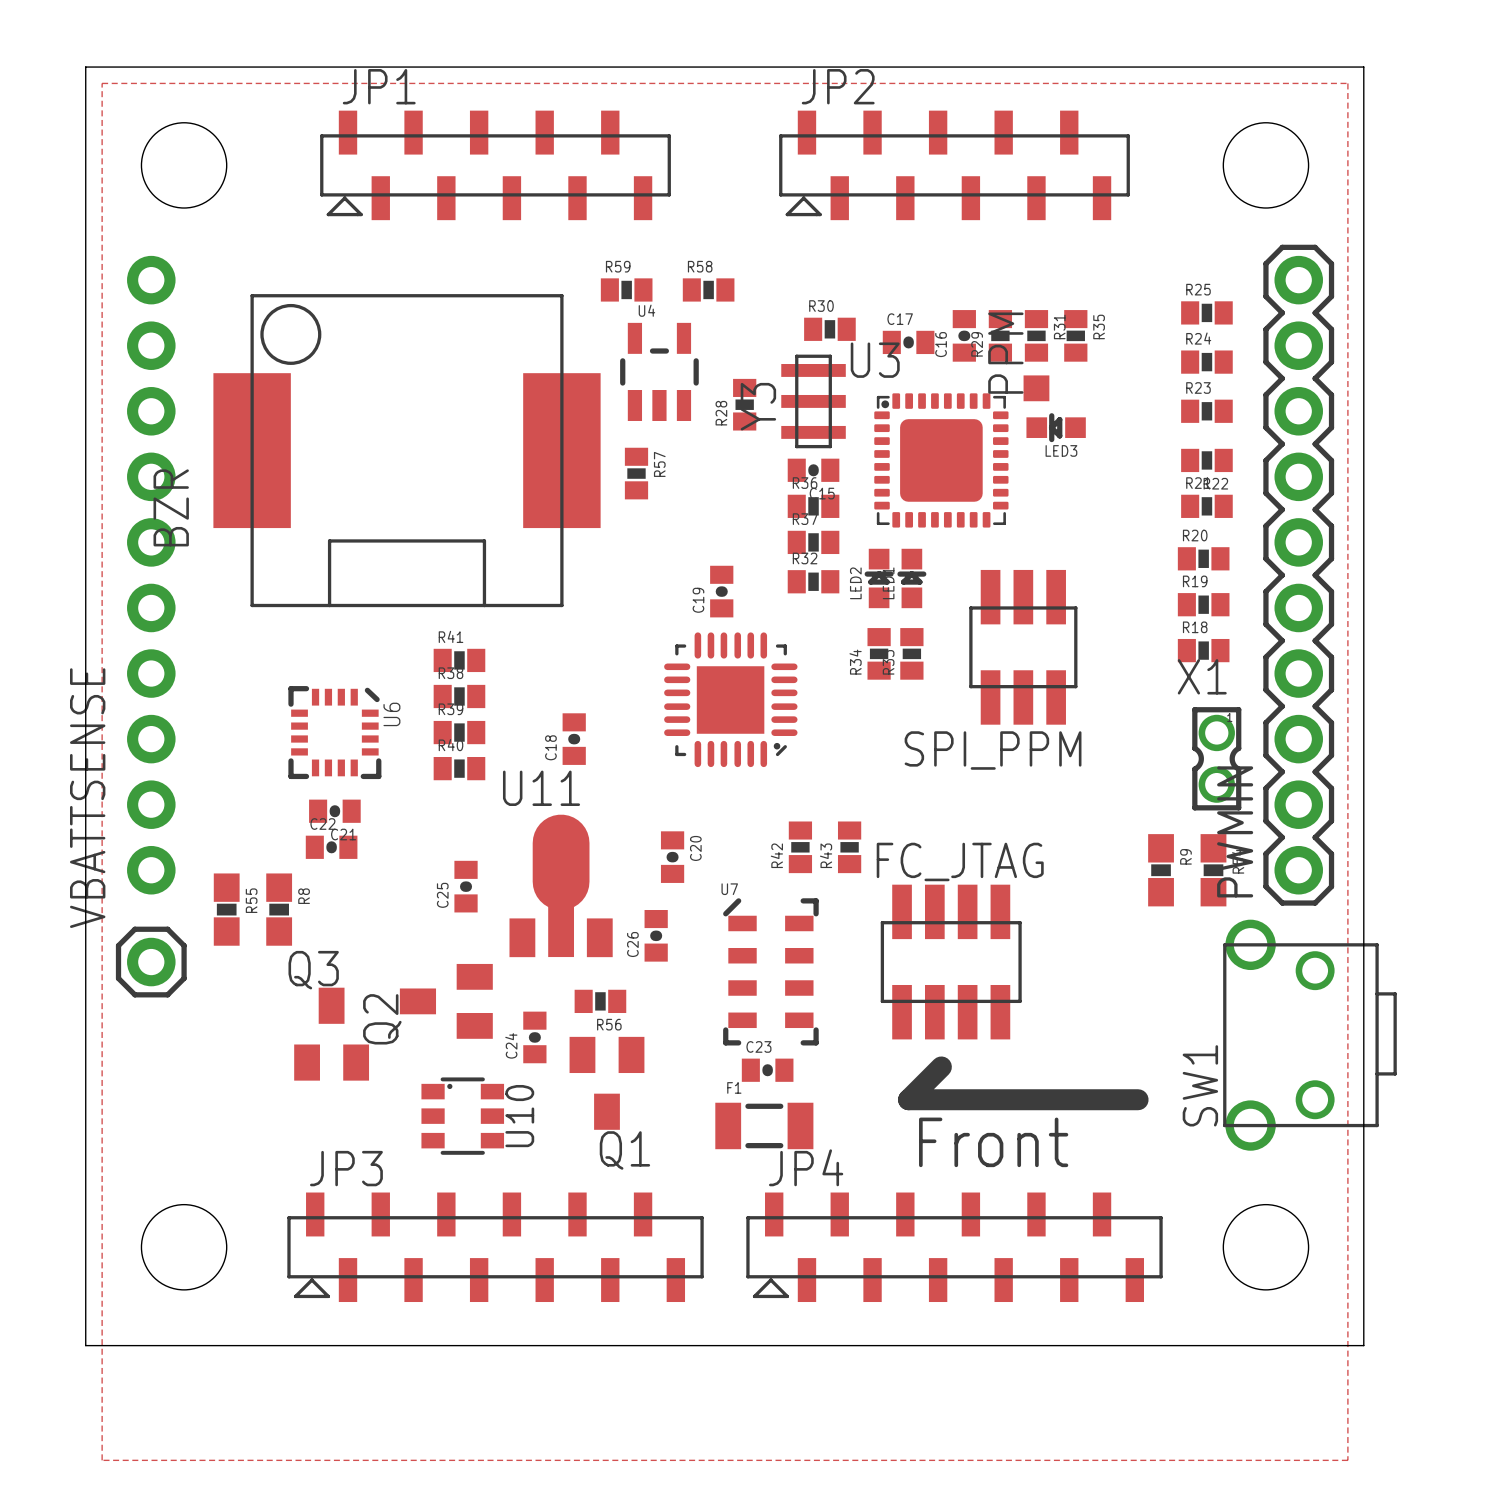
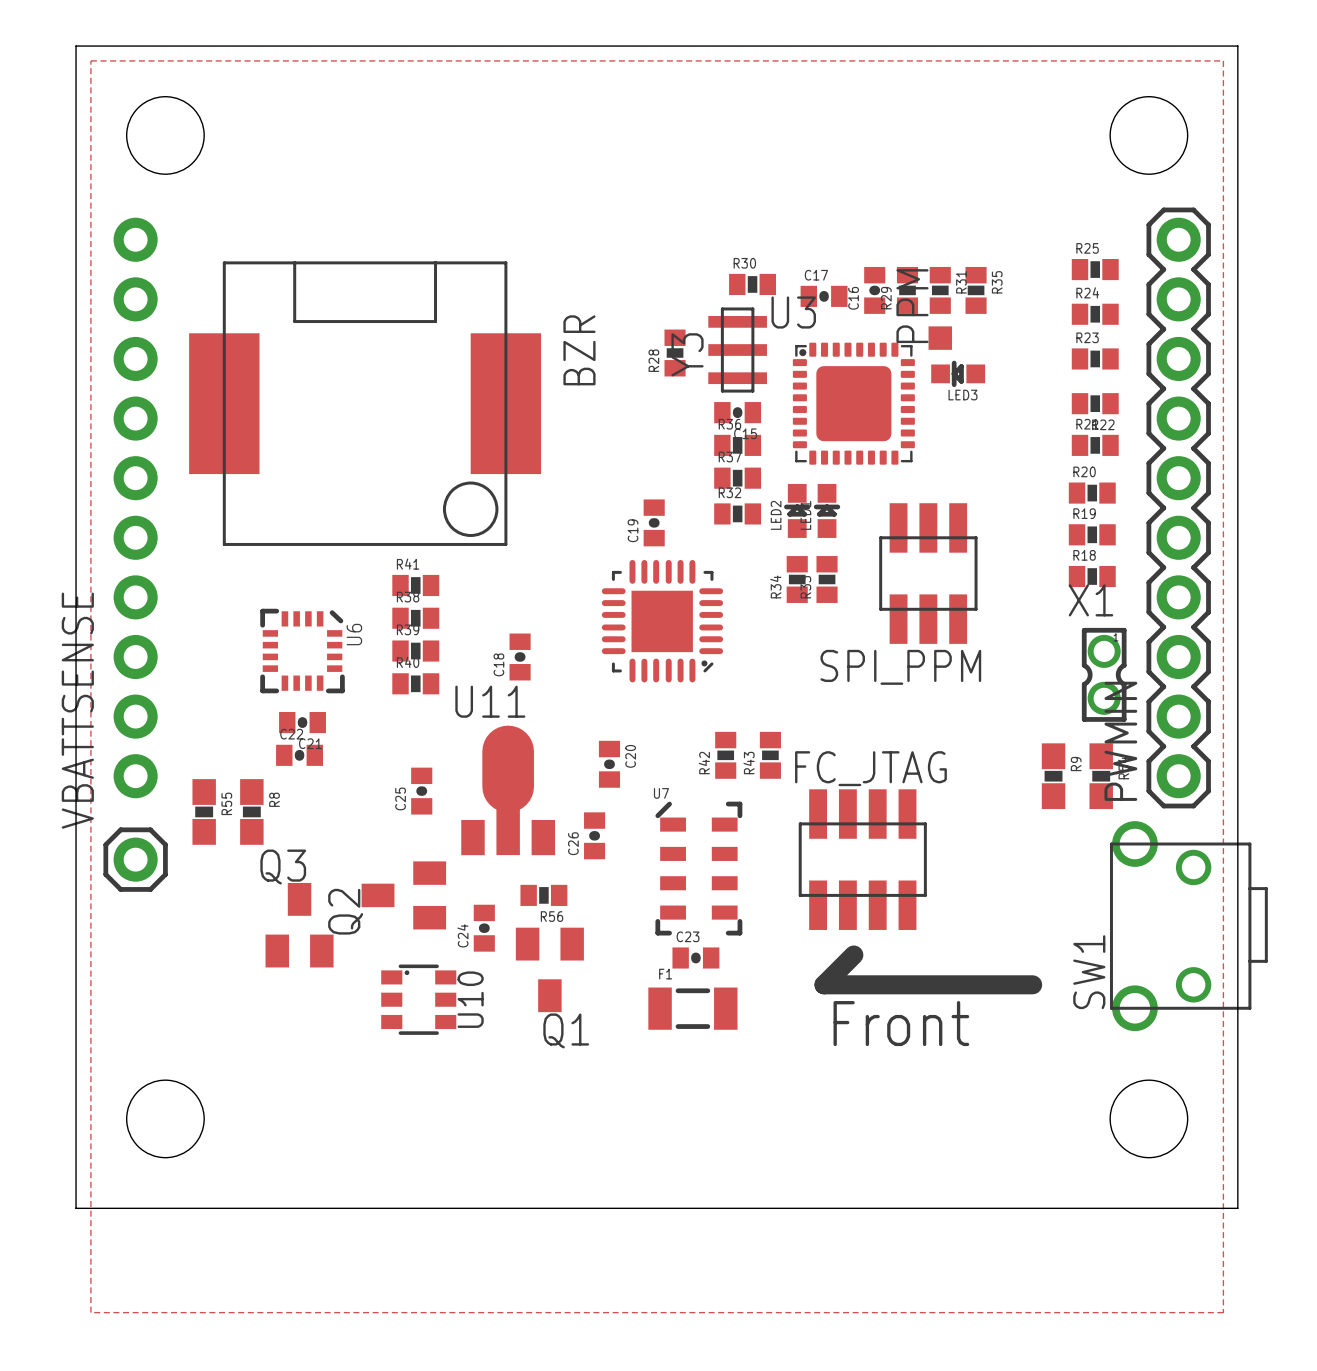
JP1: (495, 165) -> none
JP2: (954, 165) -> none
R59: (626, 289) -> none
R58: (708, 289) -> none
U4: (659, 371) -> none
BZR rotation: 0° (407, 450) -> 180° (365, 403)
R57: (636, 473) -> none
JP3: (495, 1247) -> none
JP4: (954, 1247) -> none

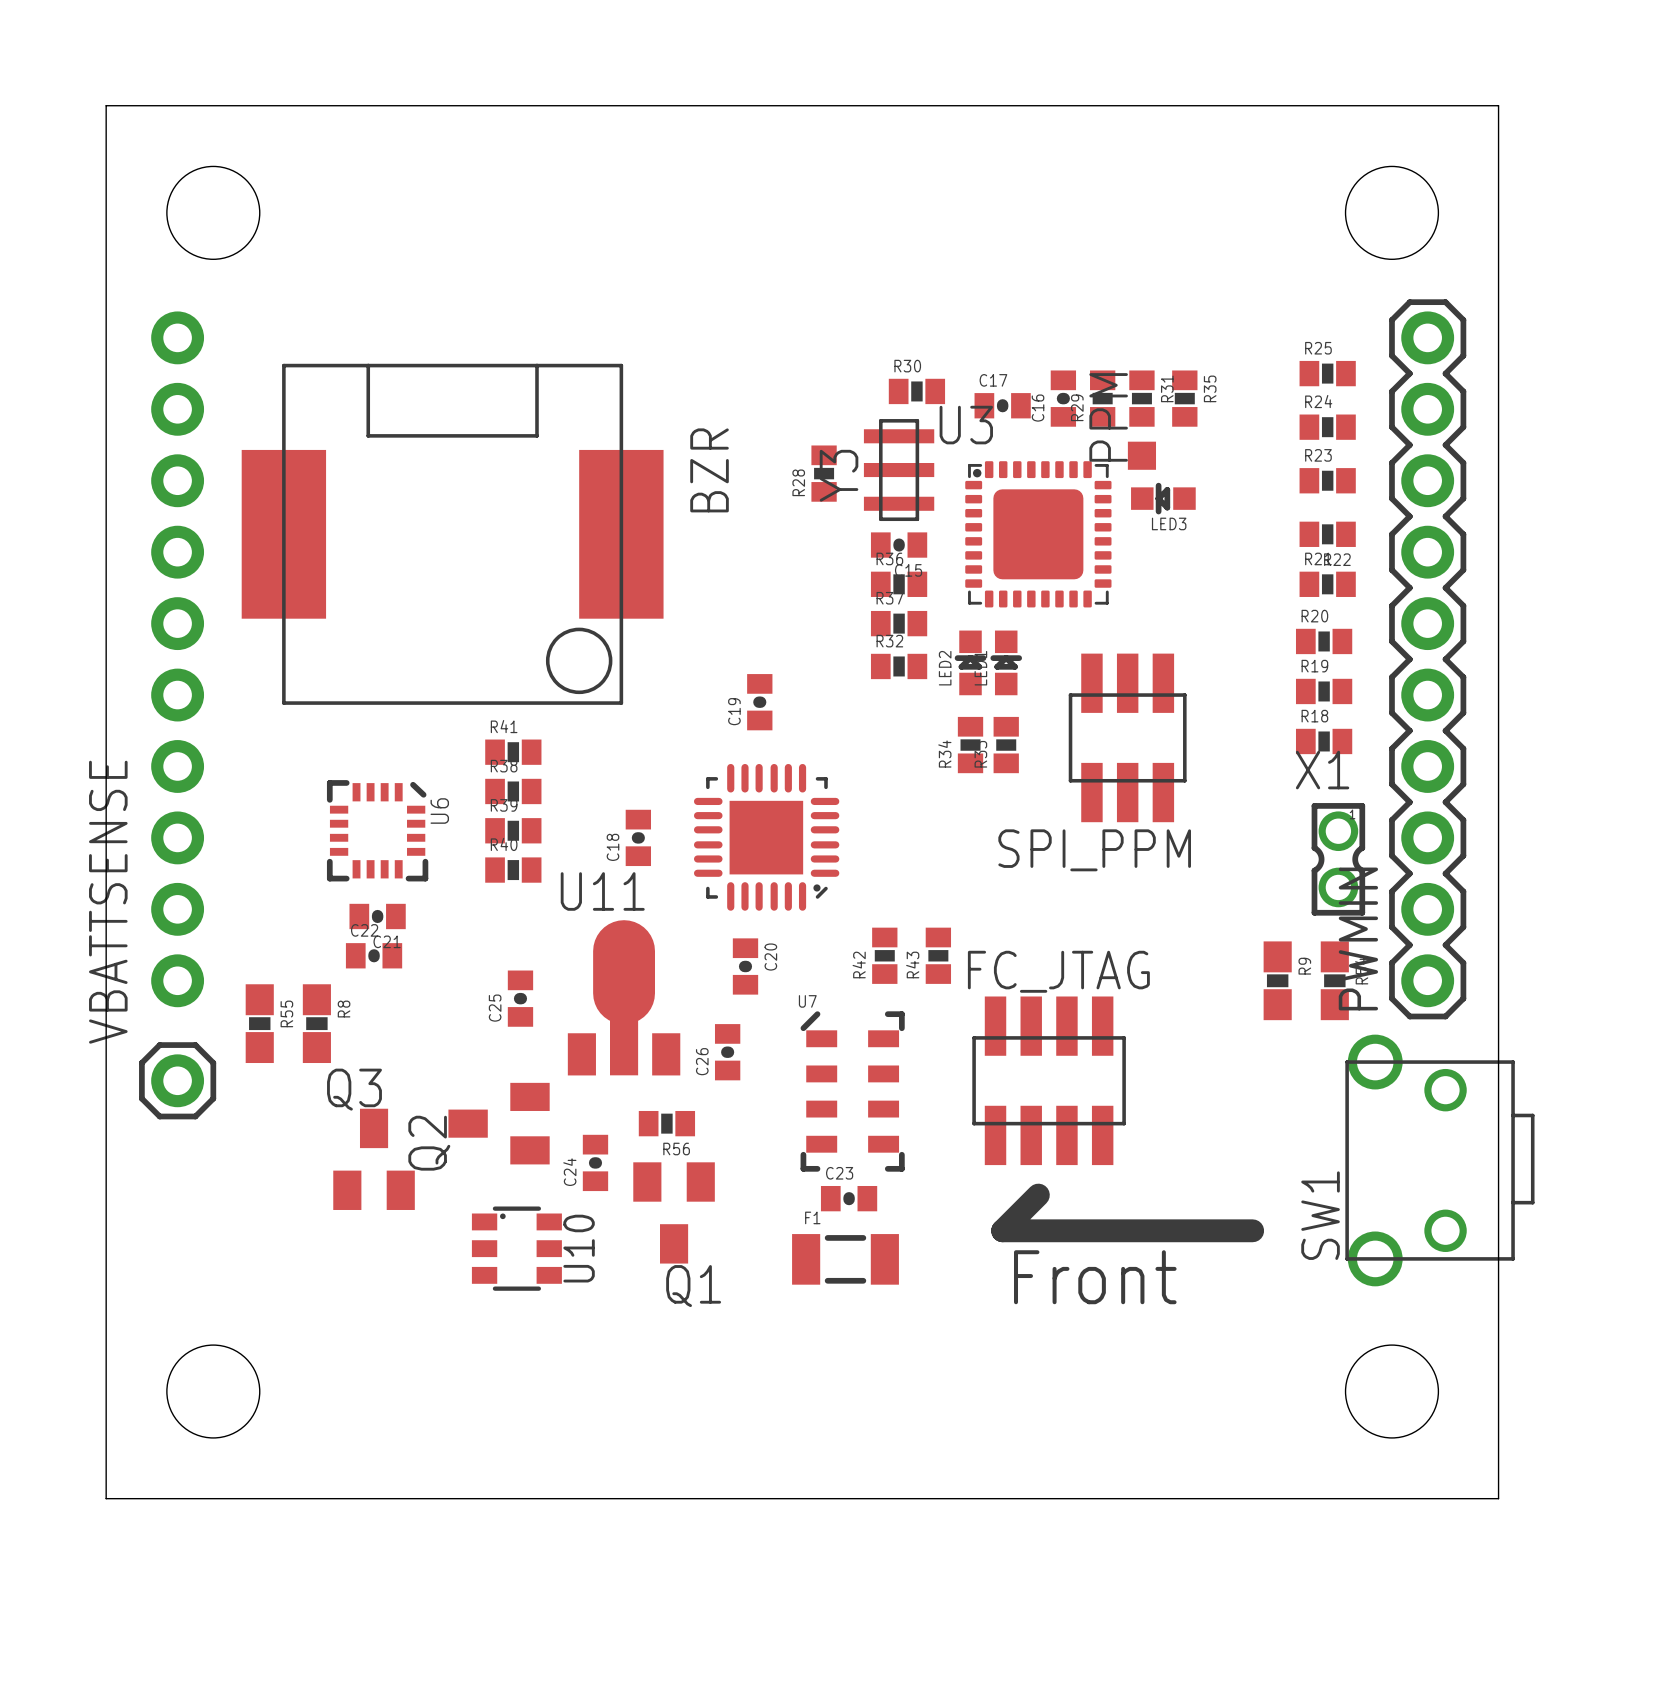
zone outline: (90, 60) (1223, 60) (1223, 1312) (90, 1312) (90, 60) -> none
C19 position: (654, 522) -> (759, 702)
part position: (662, 621) -> (766, 837)

